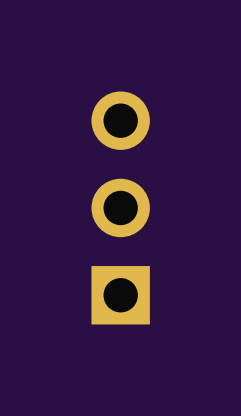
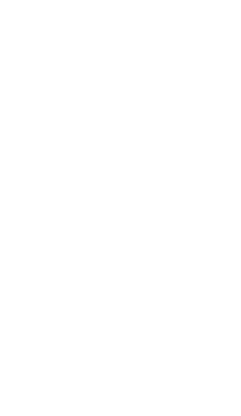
part: (120, 207) -> none

